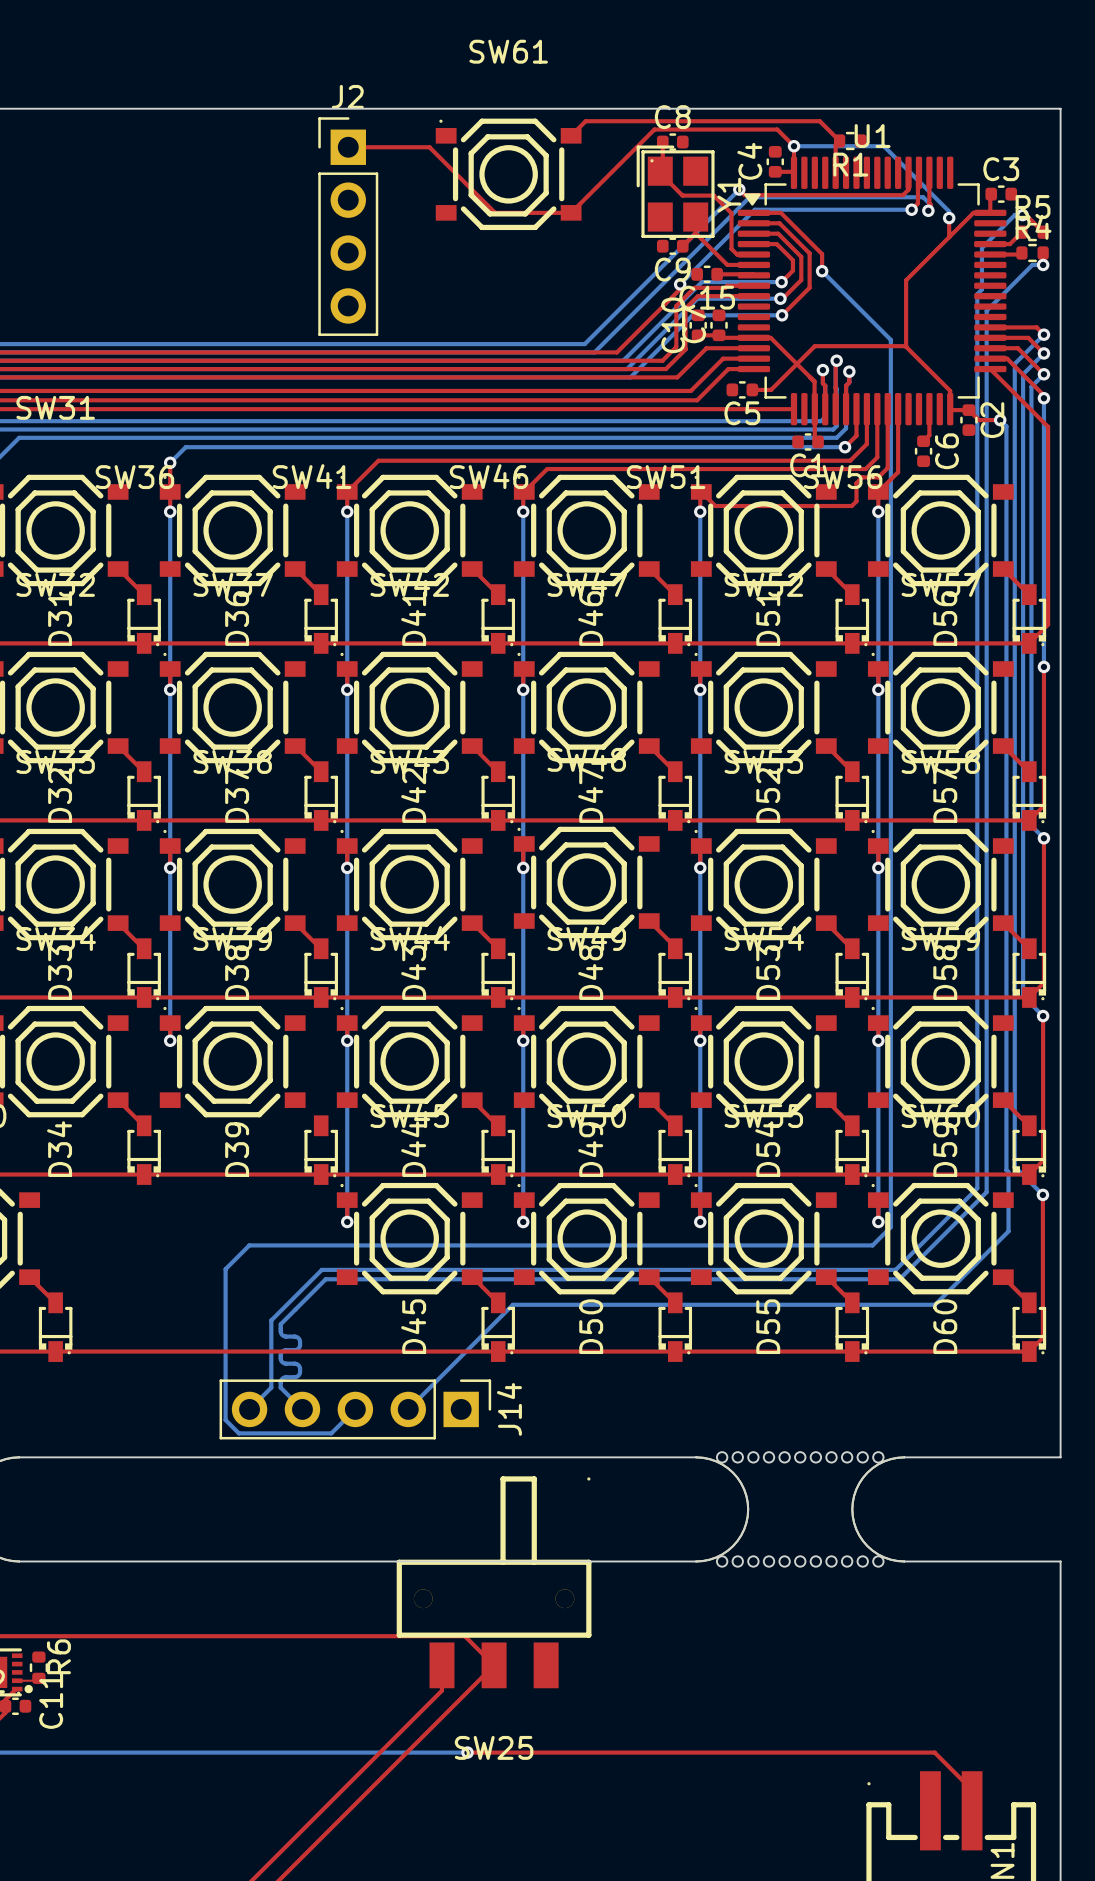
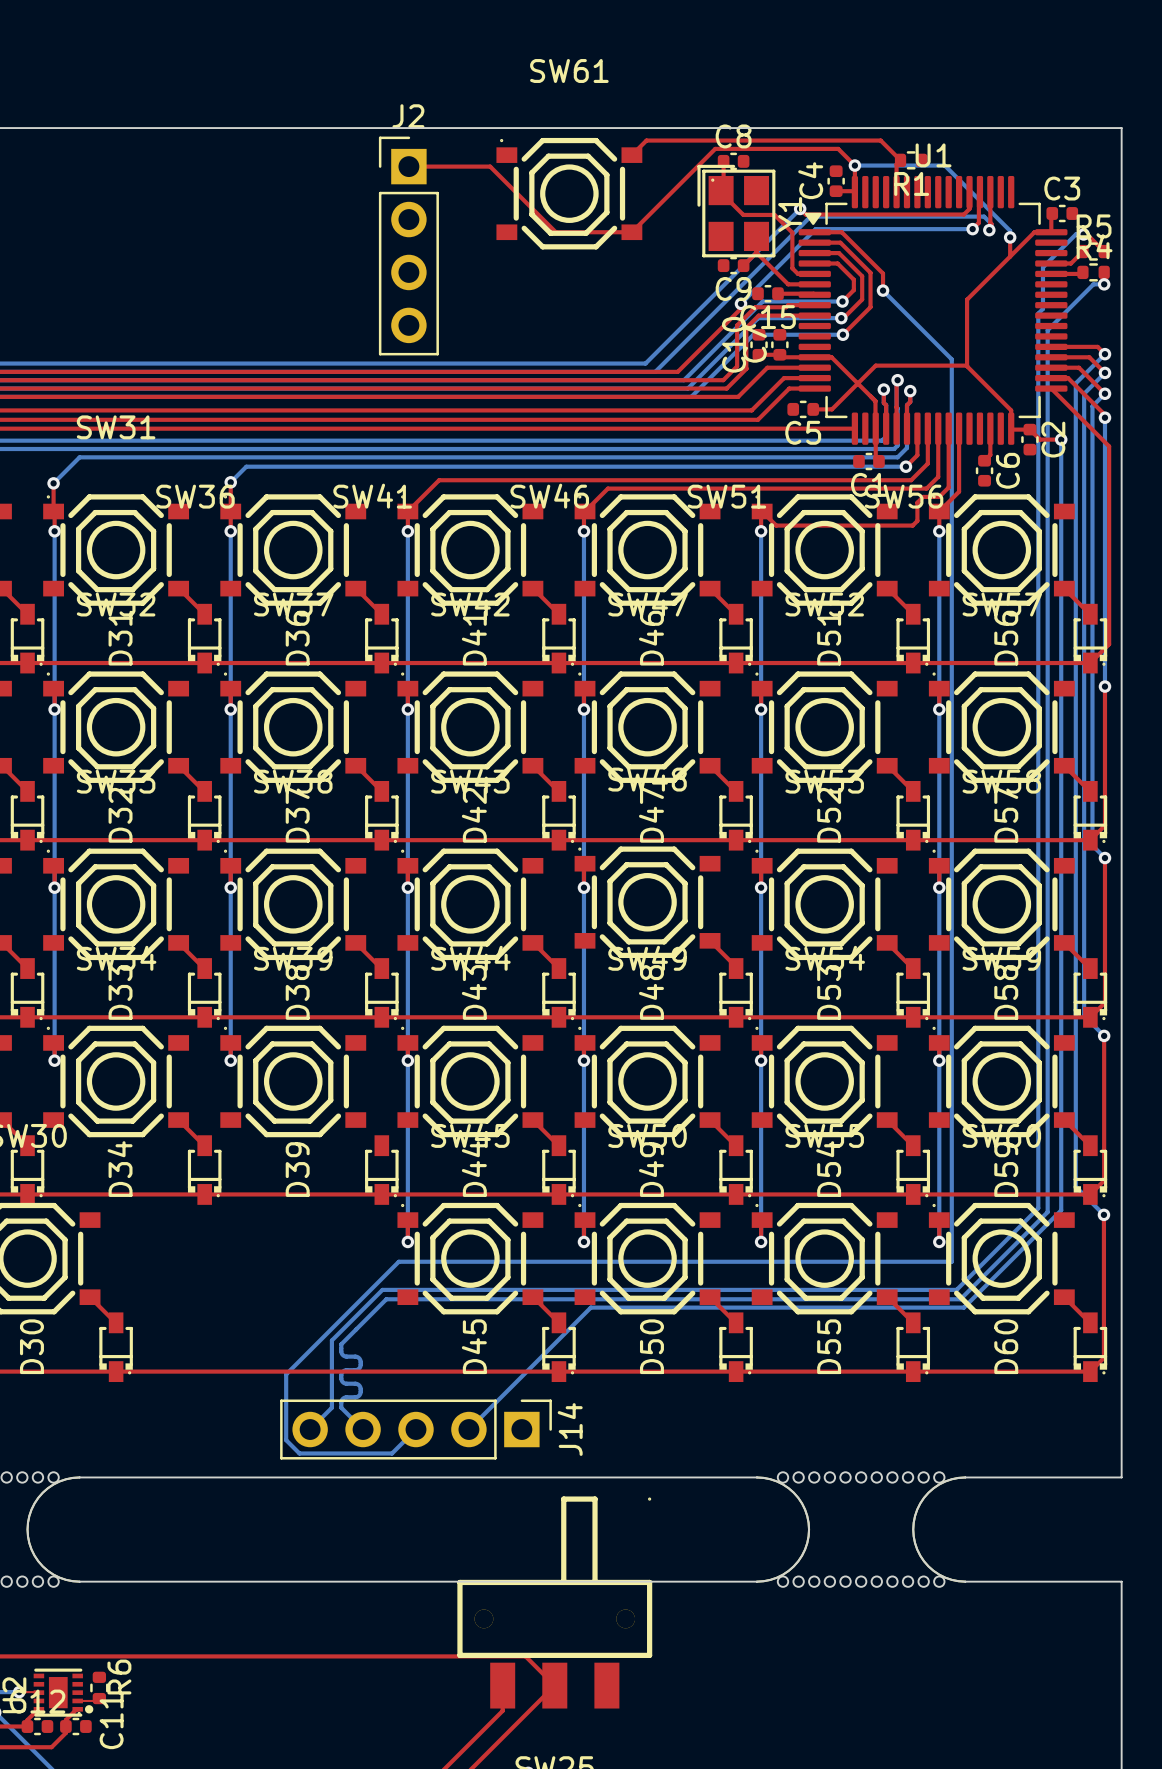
bottom track: (1000, 420) (1006, 426) (1006, 1170) (1008, 1172) (1008, 1231) (935, 1304) (512, 1304) -> (1061, 439) (1061, 1210) (963, 1307) (590, 1307) (573, 1324)
bottom track: (890, 1227) (872, 1245) (249, 1245) (225, 1269) (225, 1354) -> (951, 1247) (951, 1261) (398, 1261) (286, 1374)

